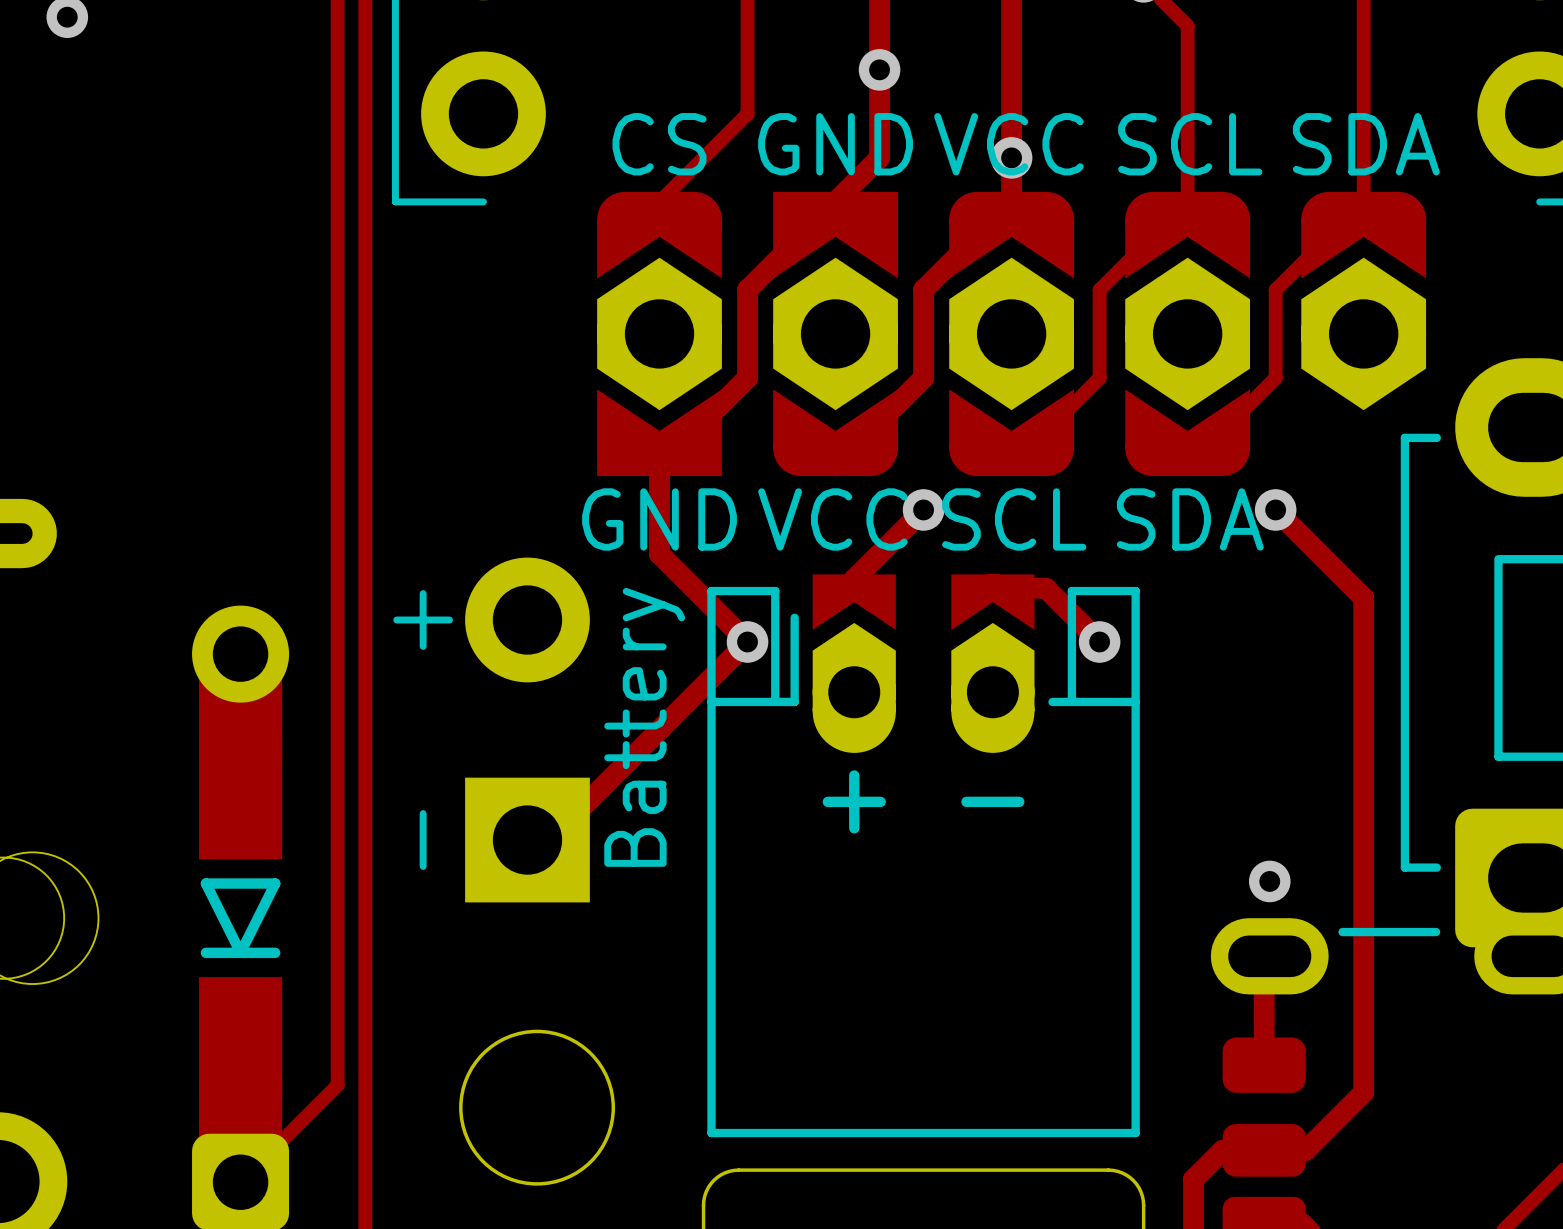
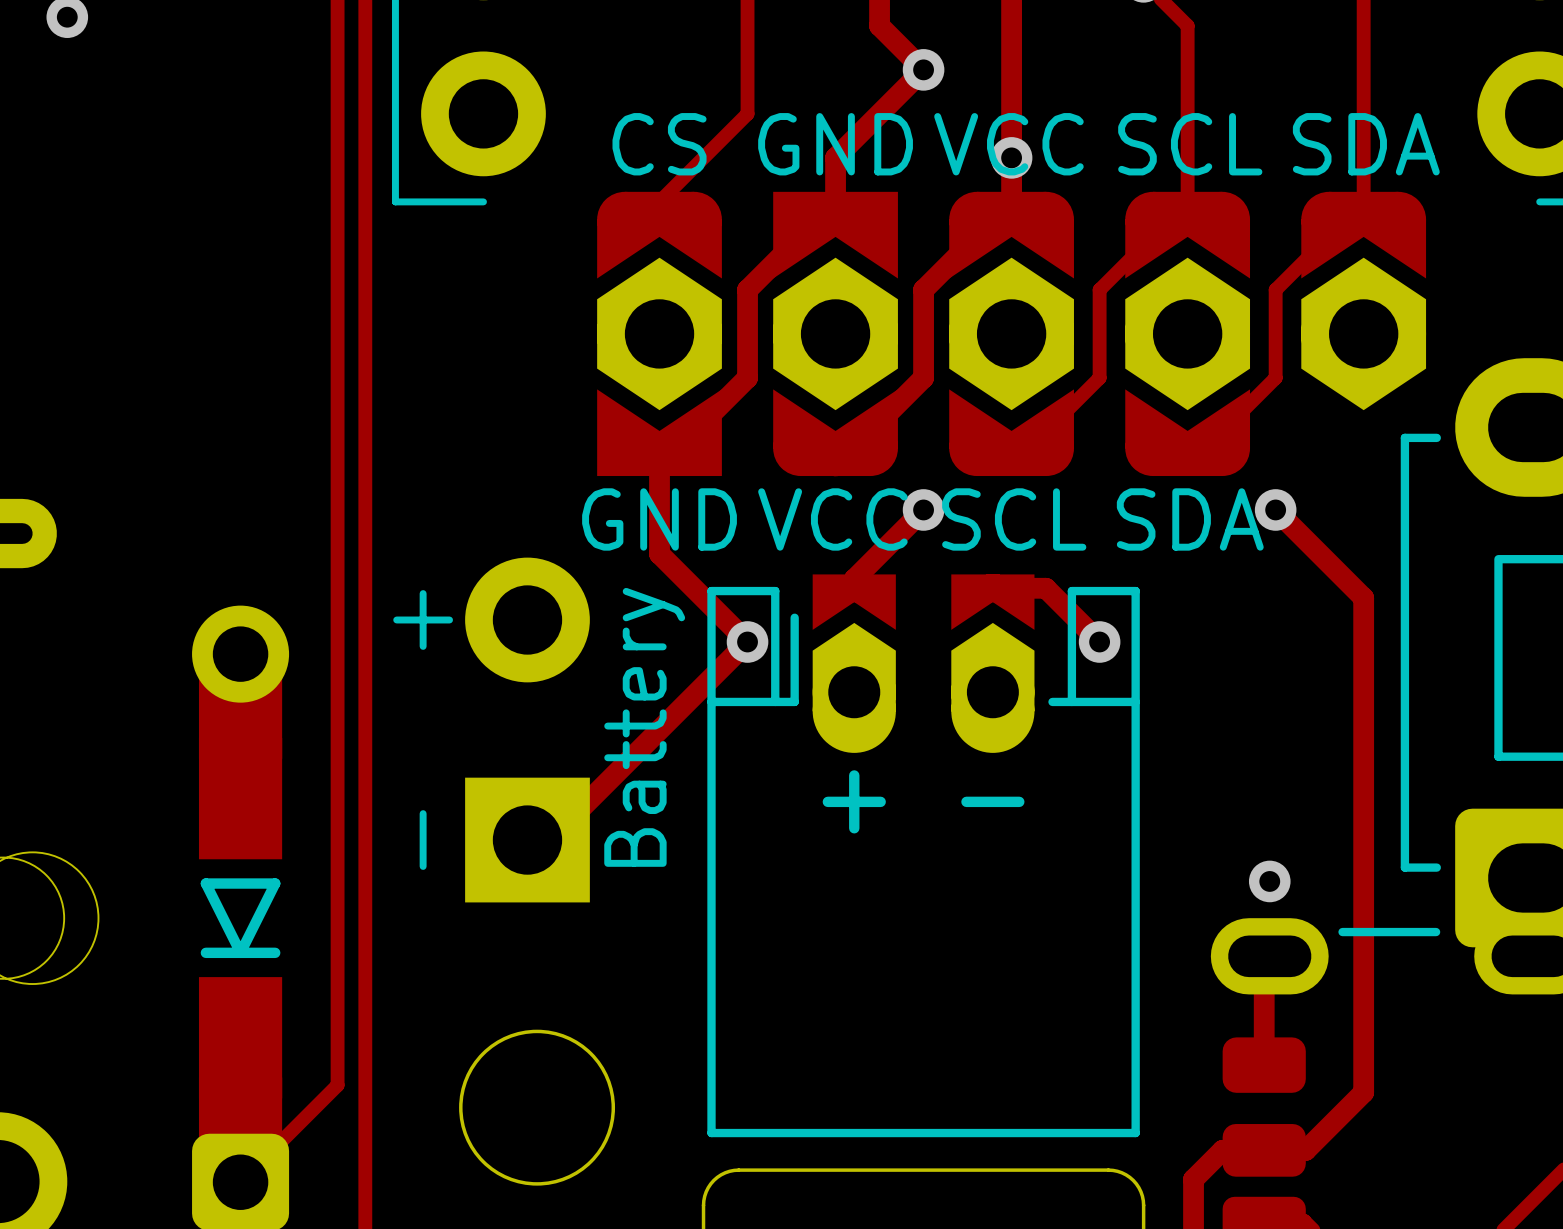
track: (879, 25) (879, 157) (835, 201) -> (879, 25) (923, 69) (835, 157) (835, 201)
via position: (879, 69) -> (923, 69)

